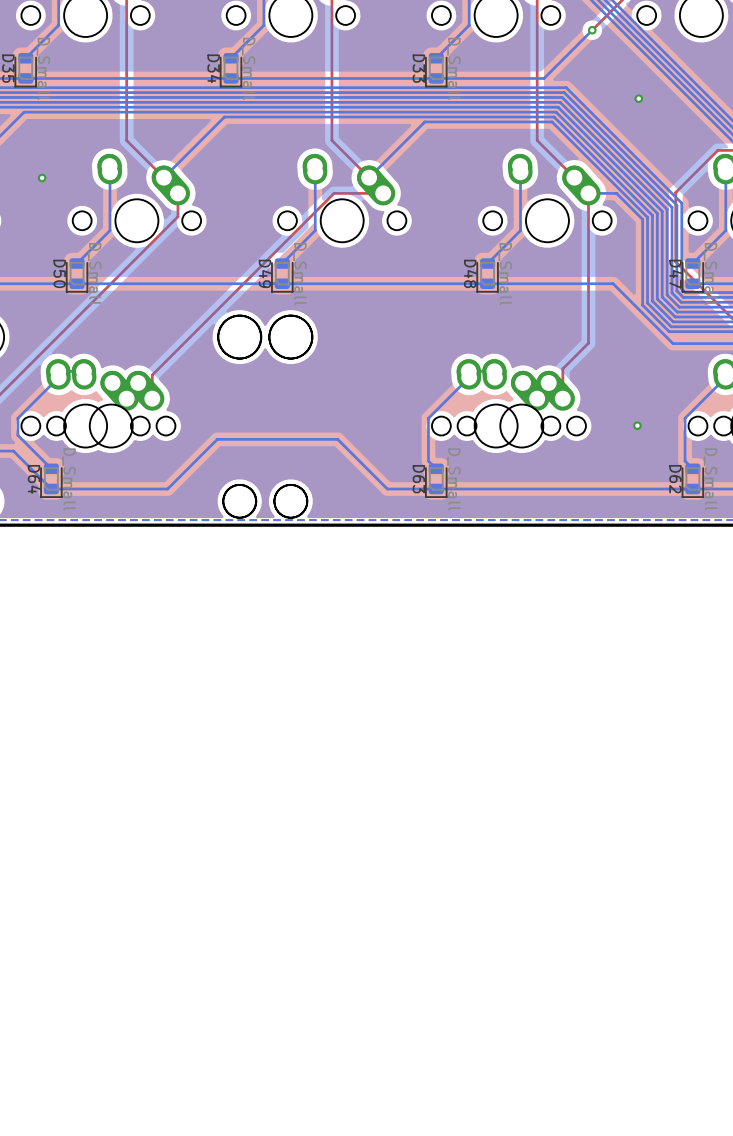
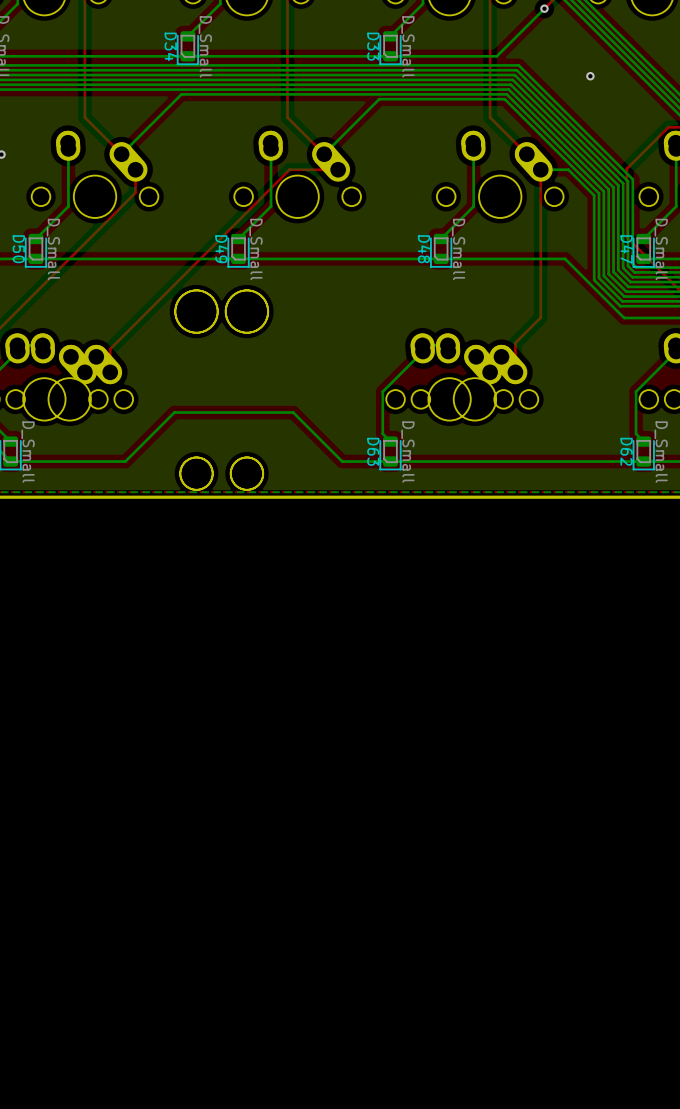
via: (637, 425) -> none

